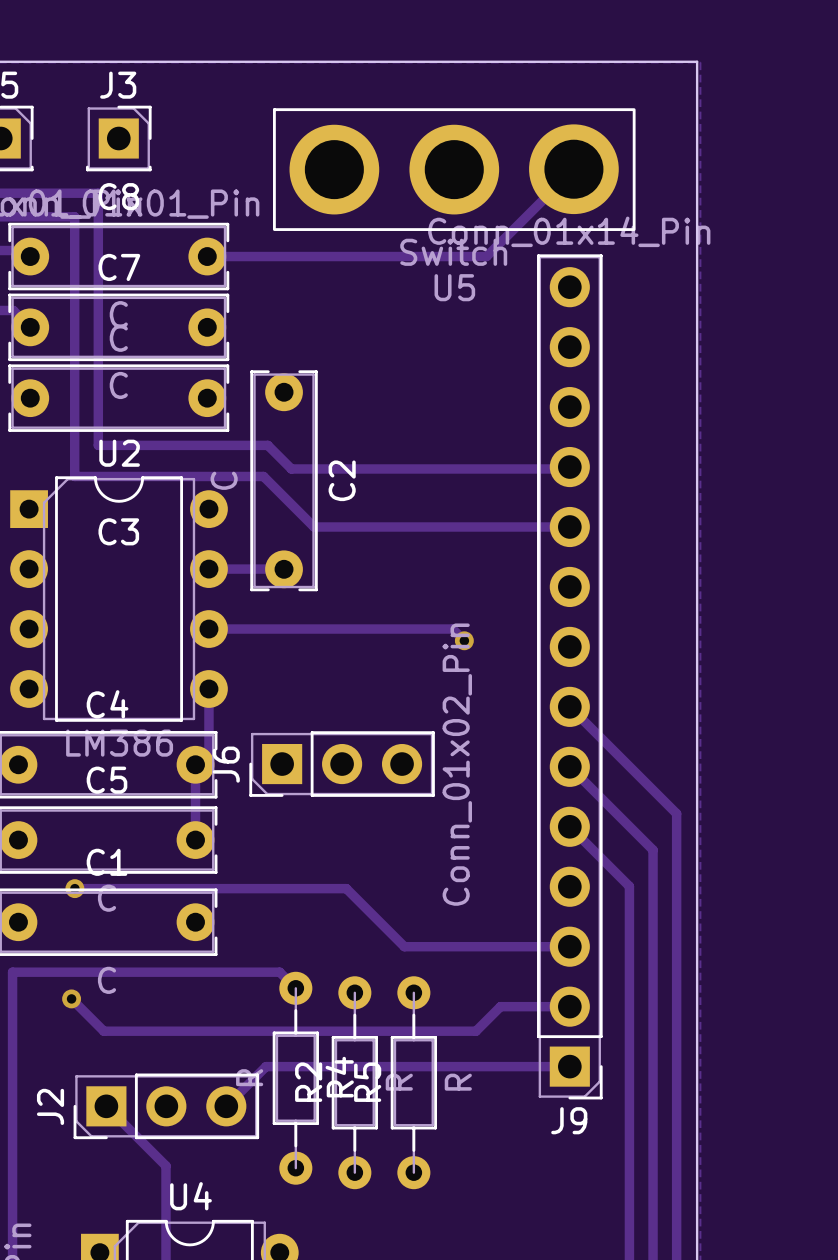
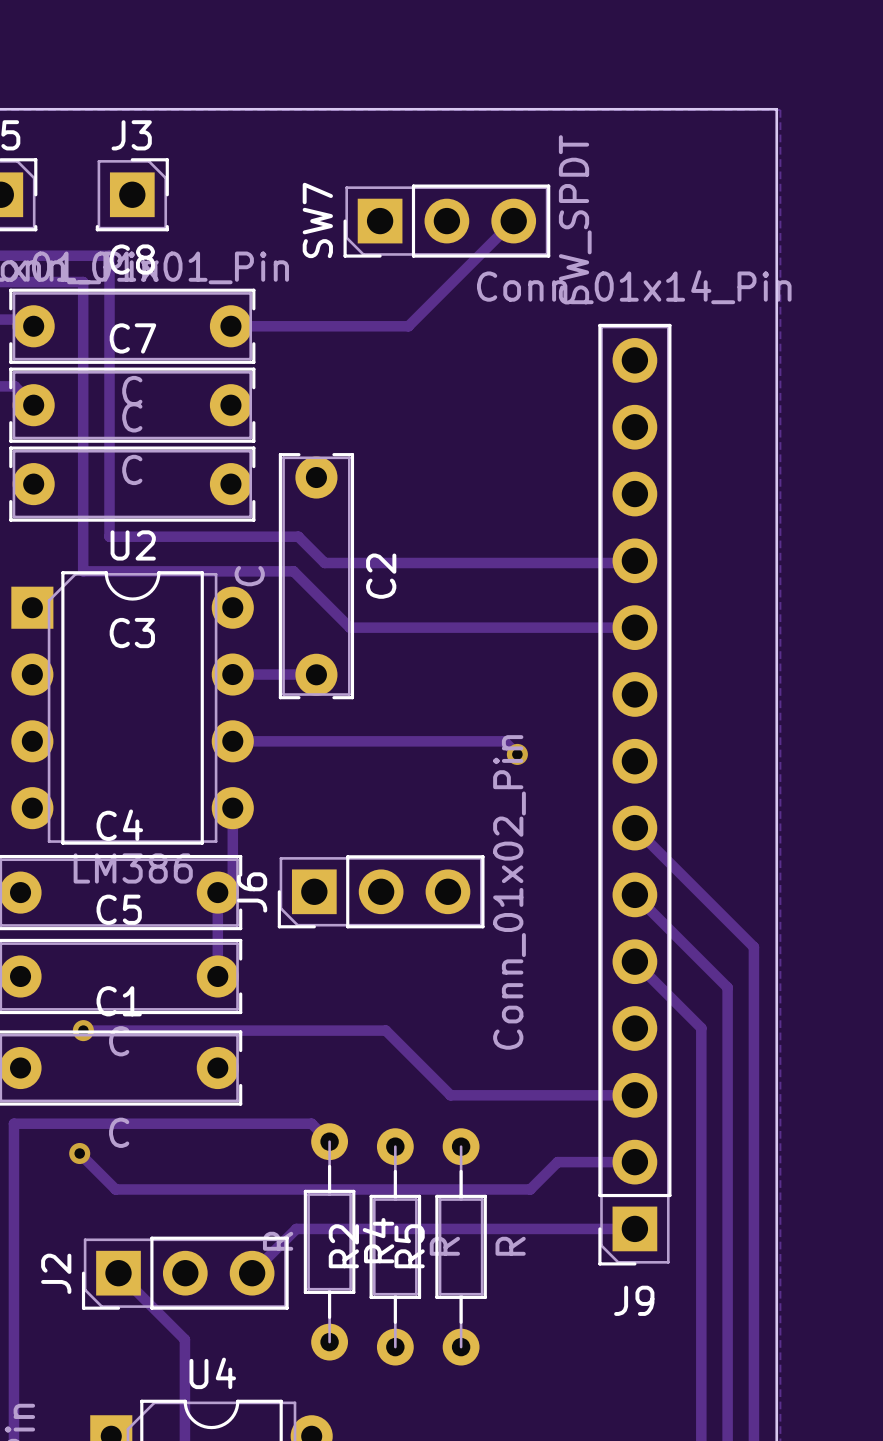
SW7: none -> SW_SPDT (446, 221)
U5: Switch (454, 169) -> none
track: (573, 169) (486, 256) (366, 256) -> (505, 228) (408, 326)
J9 footprint: [537, 254, 603, 1100] -> [598, 323, 672, 1266]

